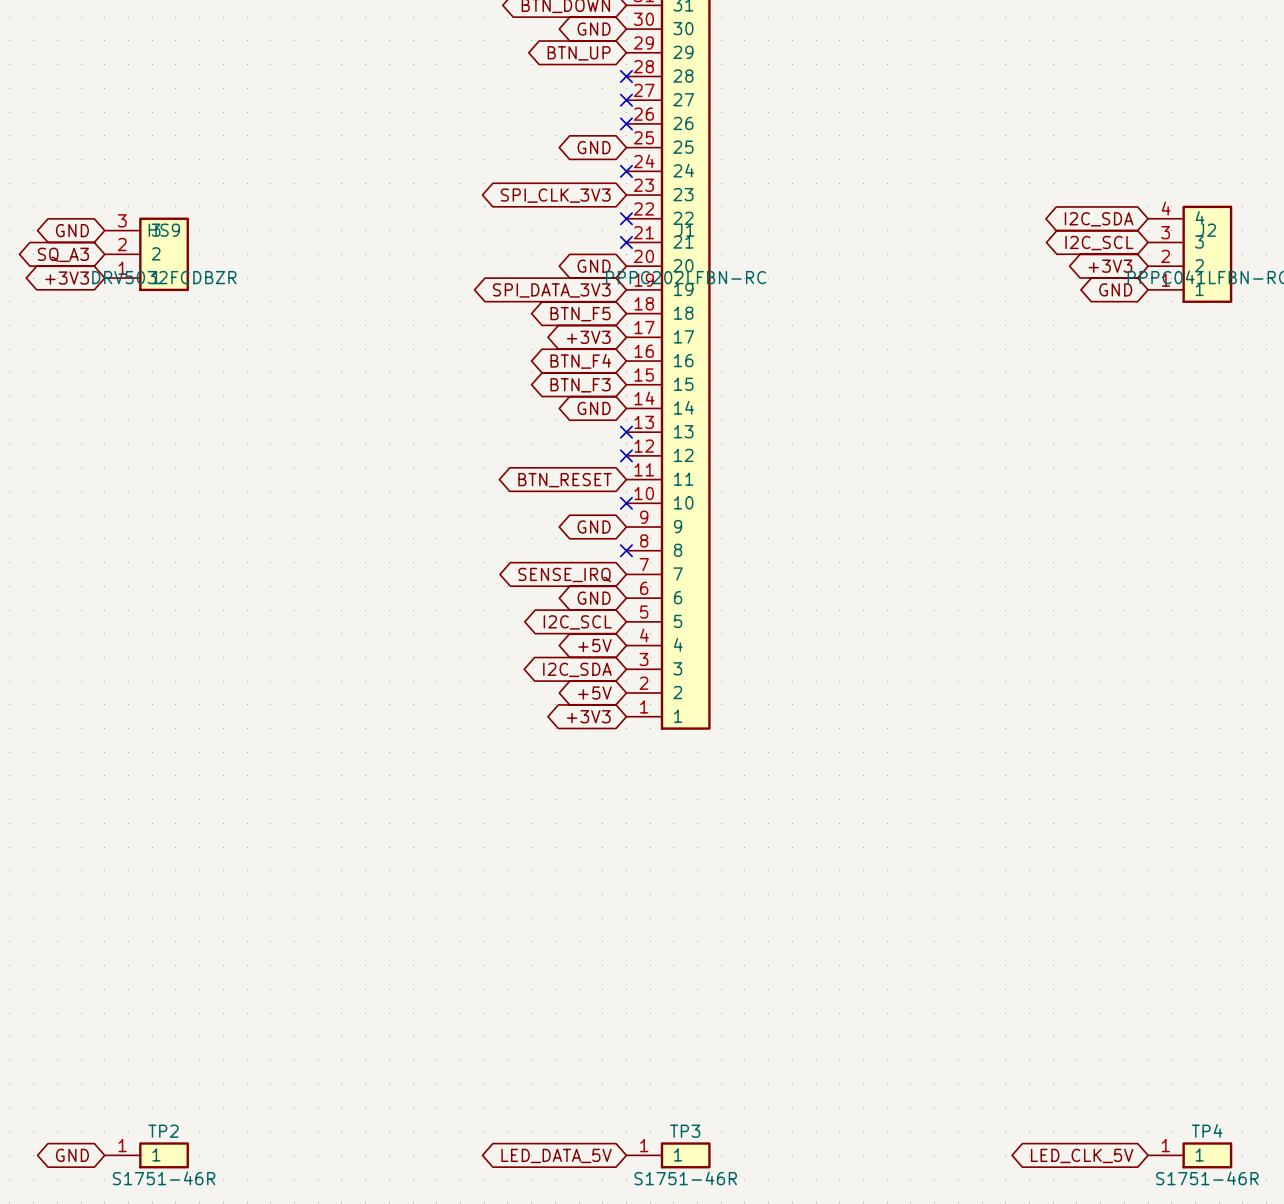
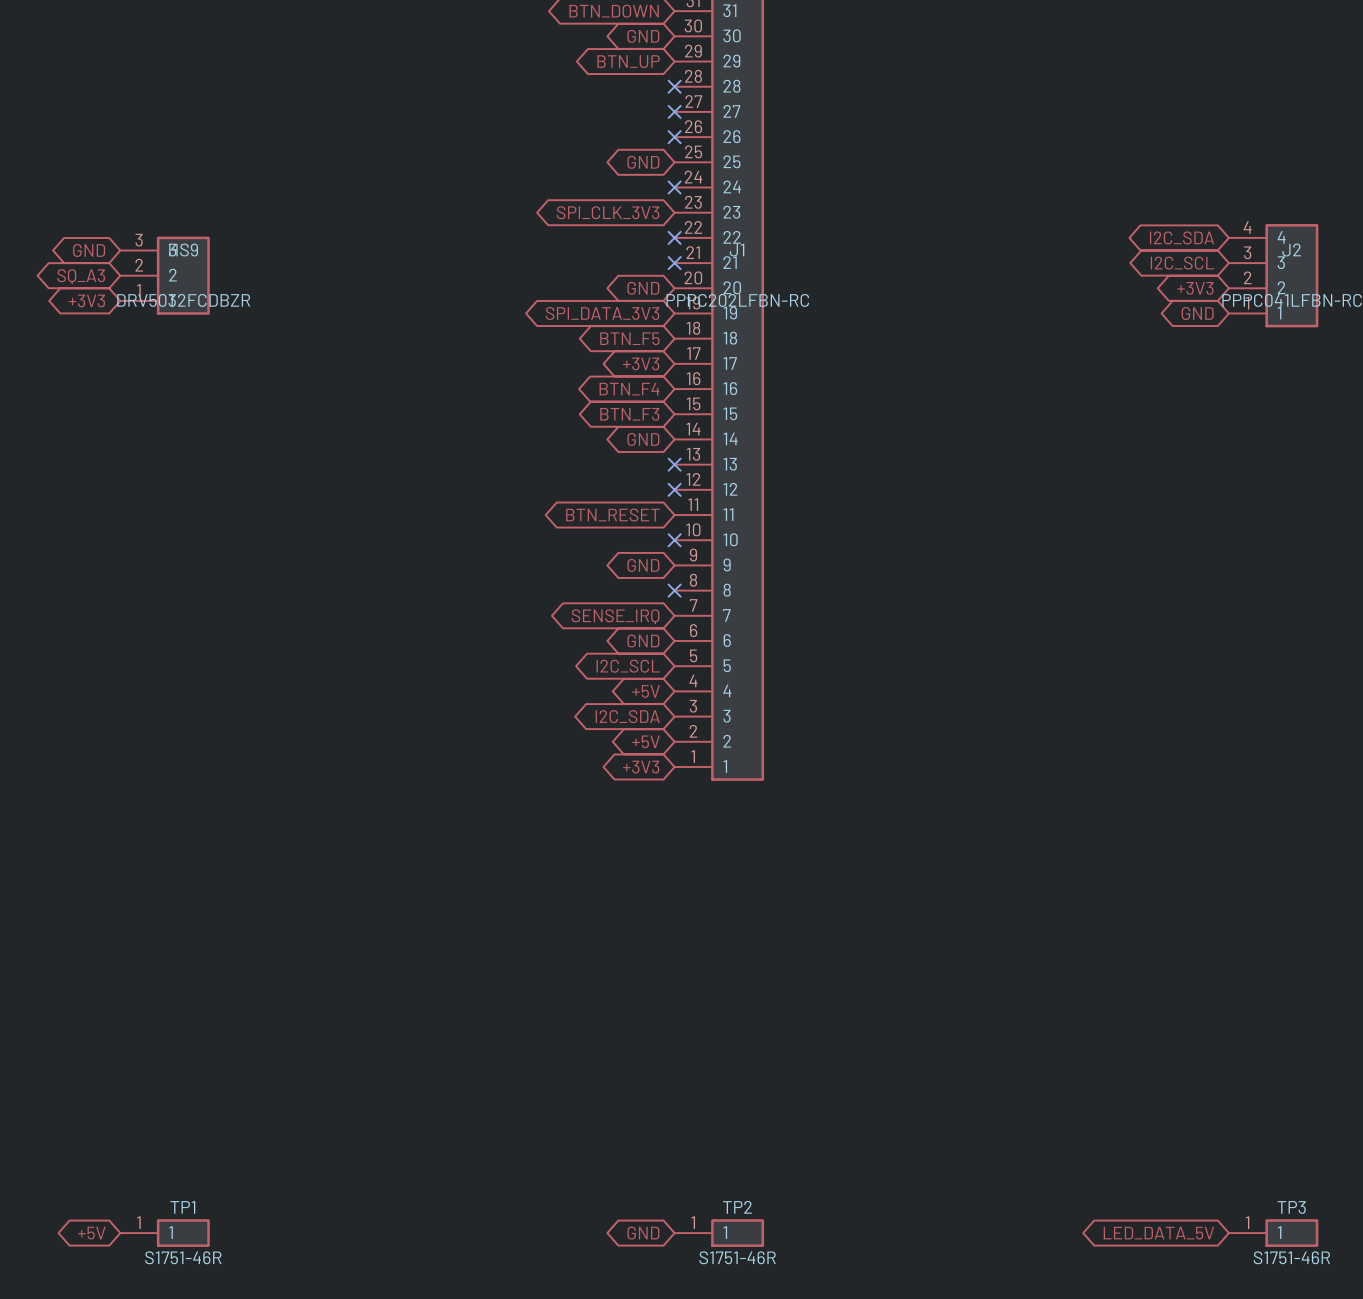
TP4 name: TP4 (1207, 1130) -> TP3 (1291, 1207)
TP2 name: TP2 (163, 1131) -> TP1 (182, 1207)
TP3 name: TP3 (685, 1131) -> TP2 (737, 1207)
global label: GND (72, 1155) -> +5V (91, 1233)
global label: LED_DATA_5V (556, 1155) -> GND (643, 1233)
global label: LED_CLK_5V (1082, 1155) -> LED_DATA_5V (1158, 1233)

